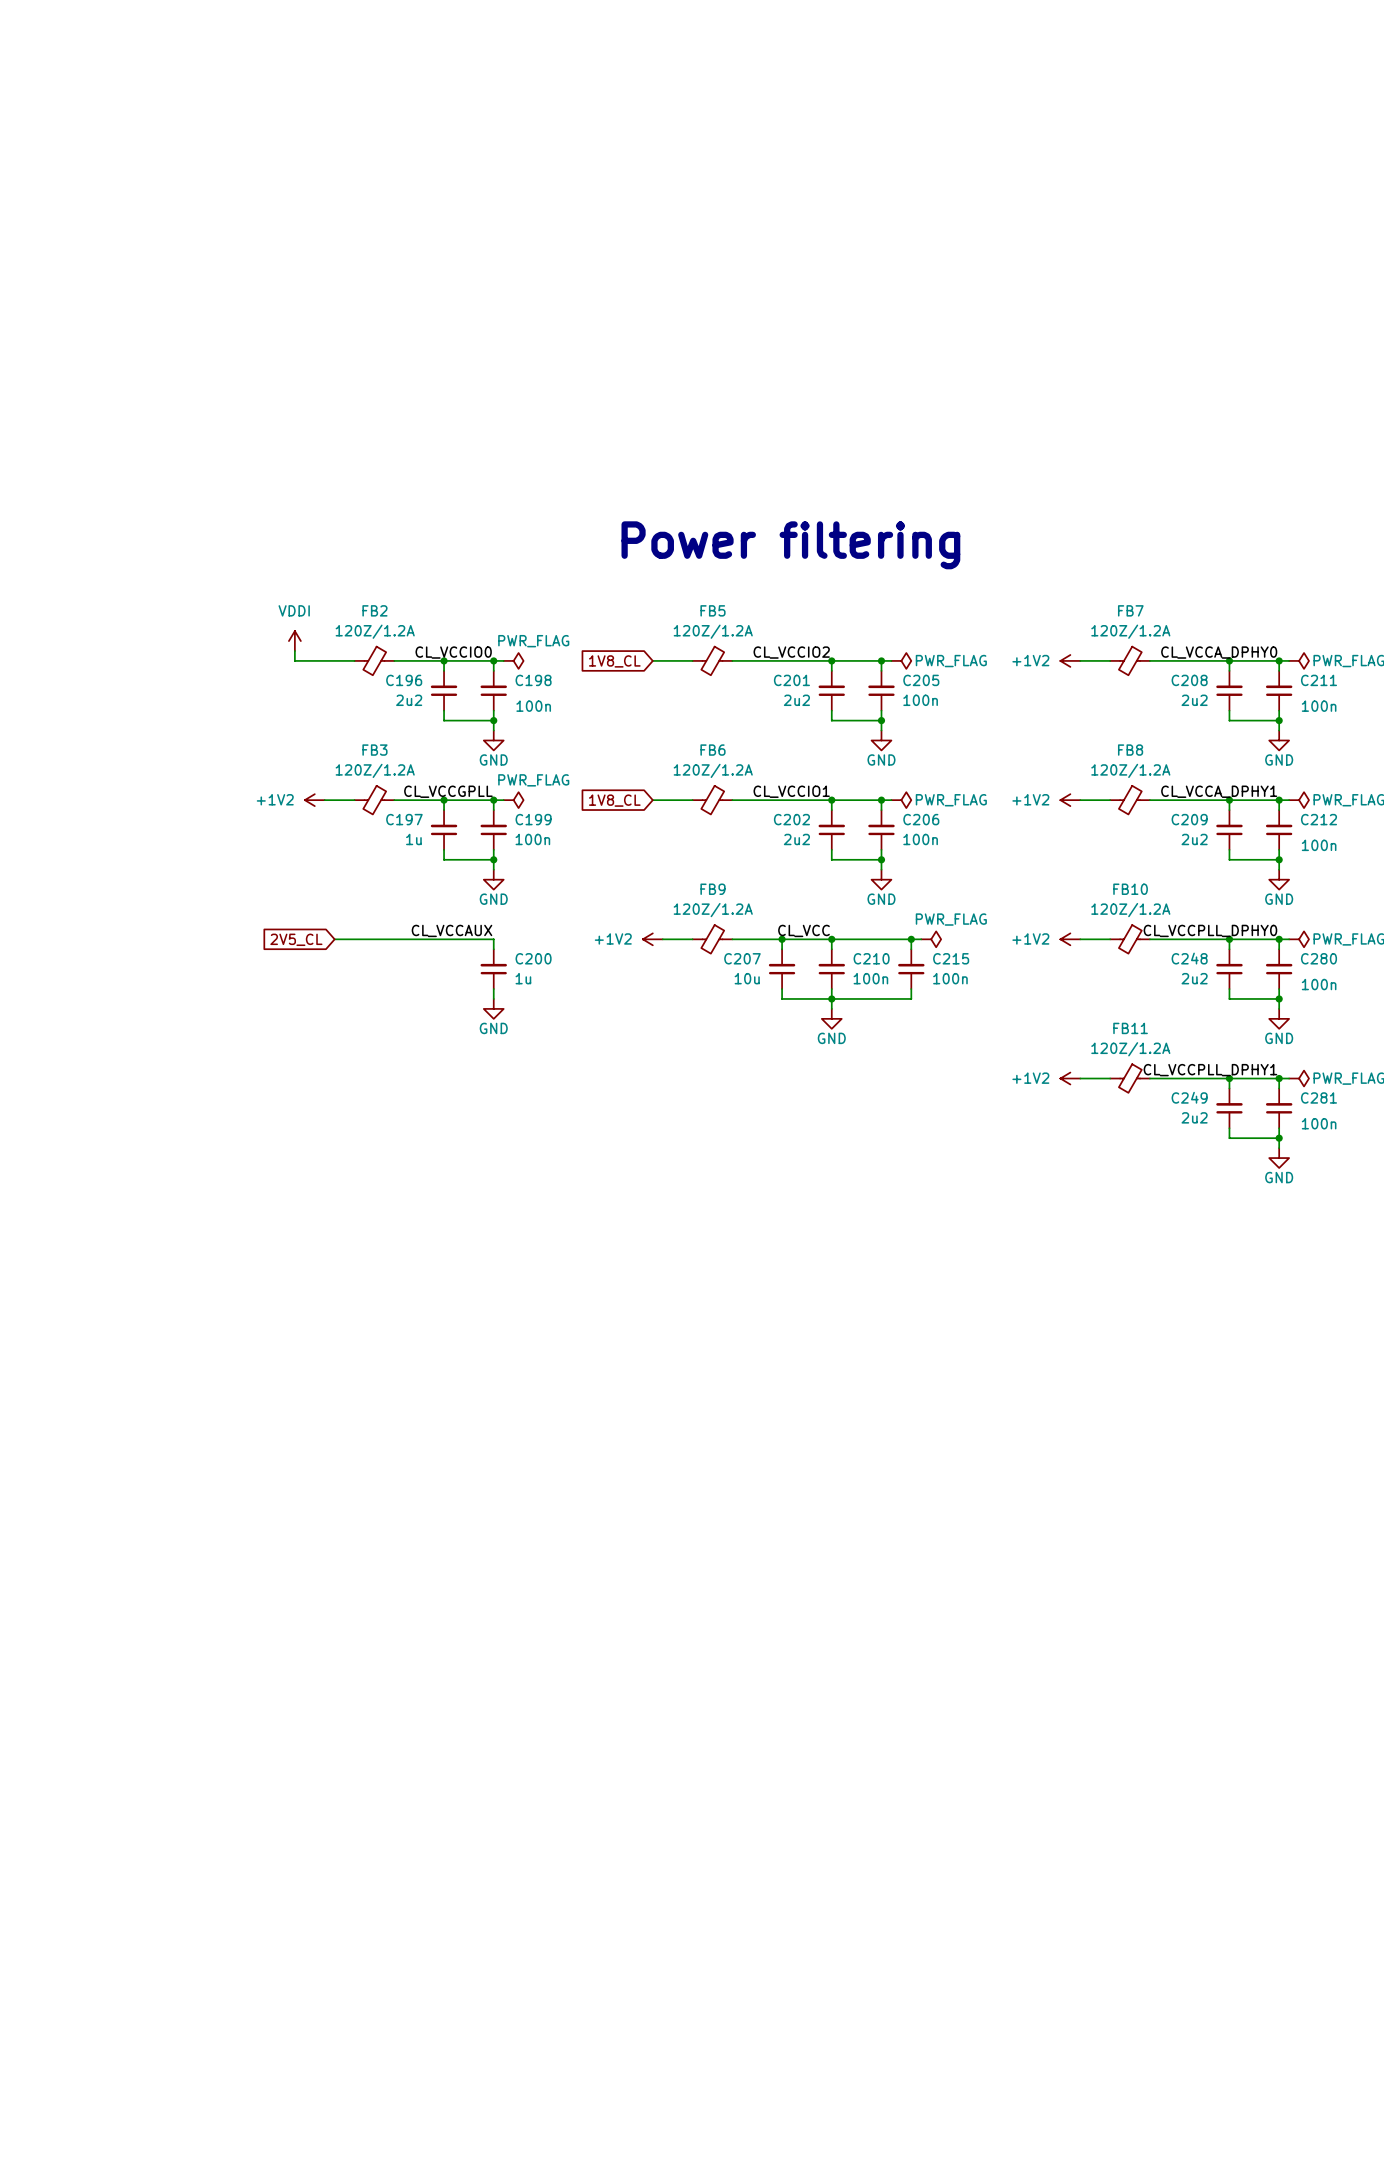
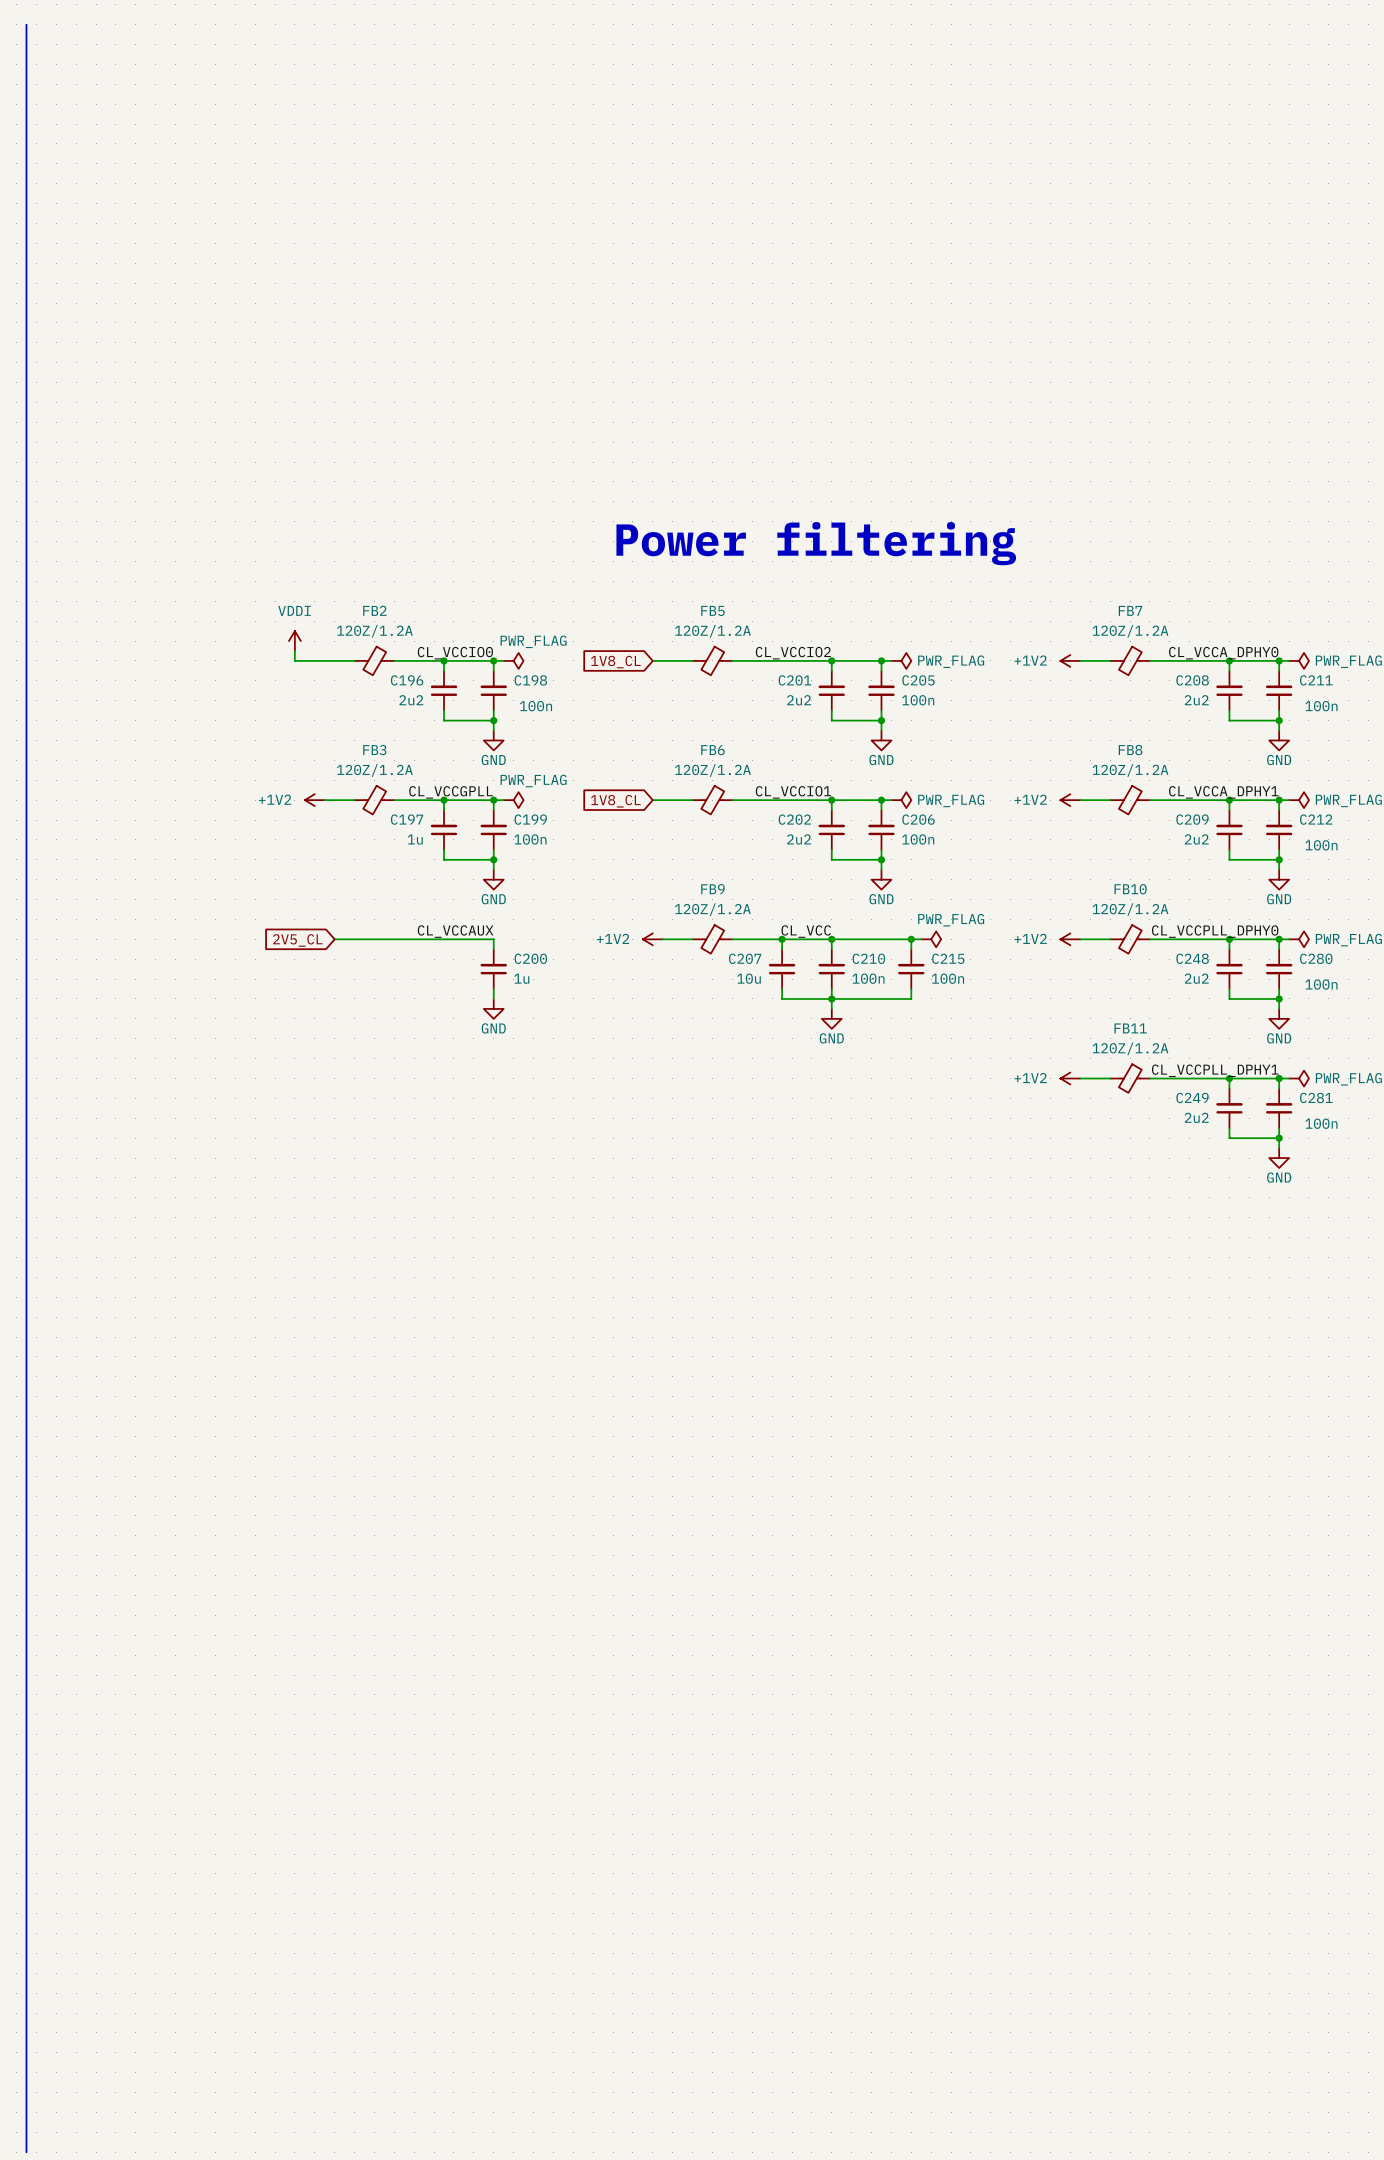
line: none -> (26, 24) (26, 2152)

